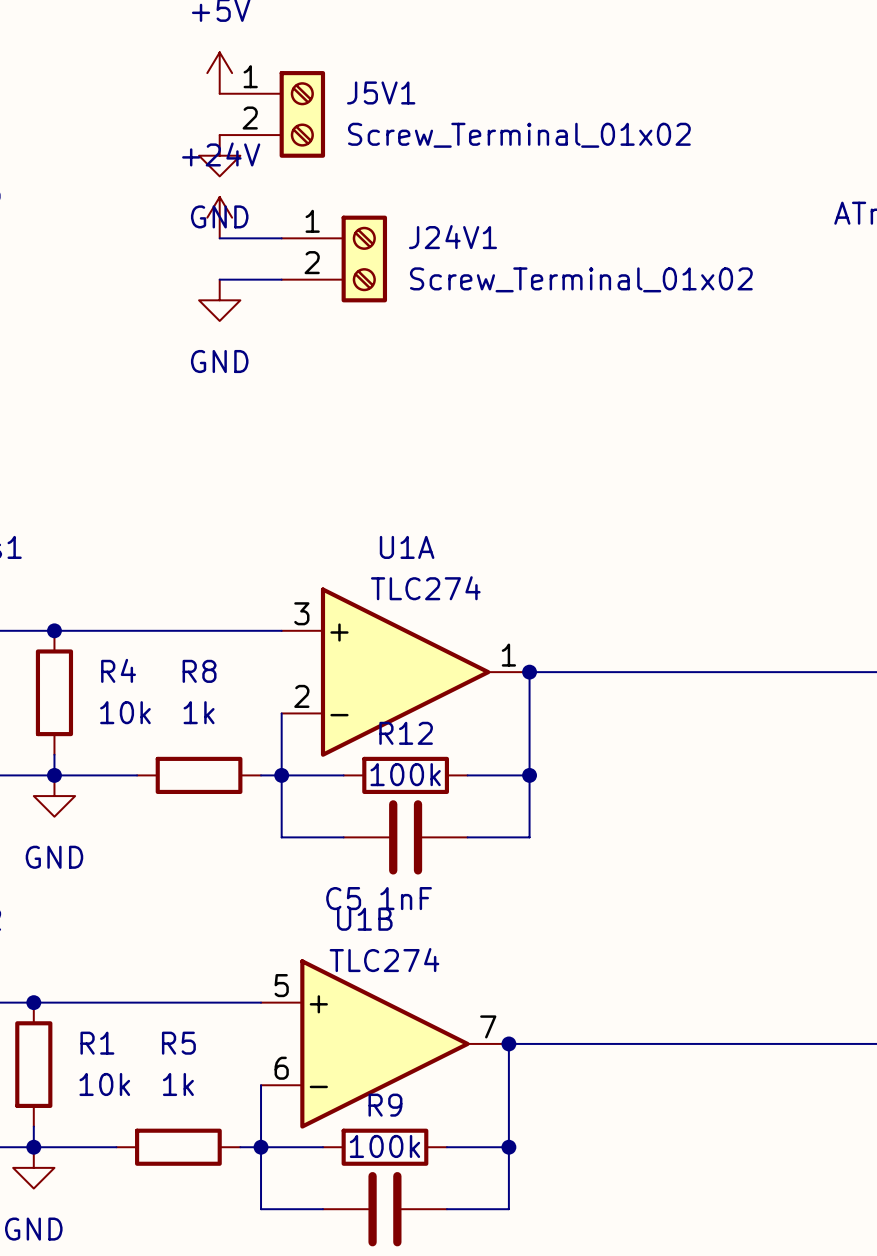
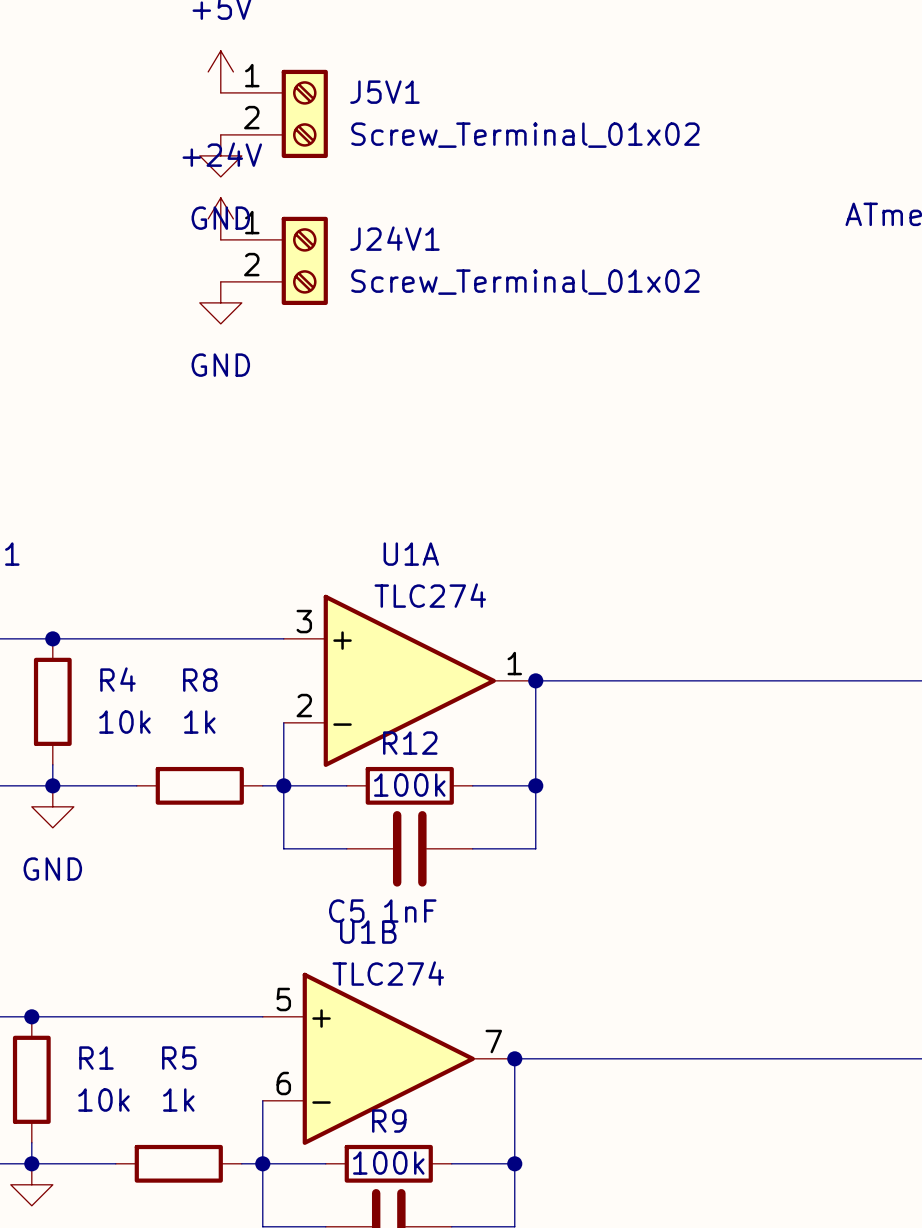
J24V1 position: (334, 259) -> (274, 260)

